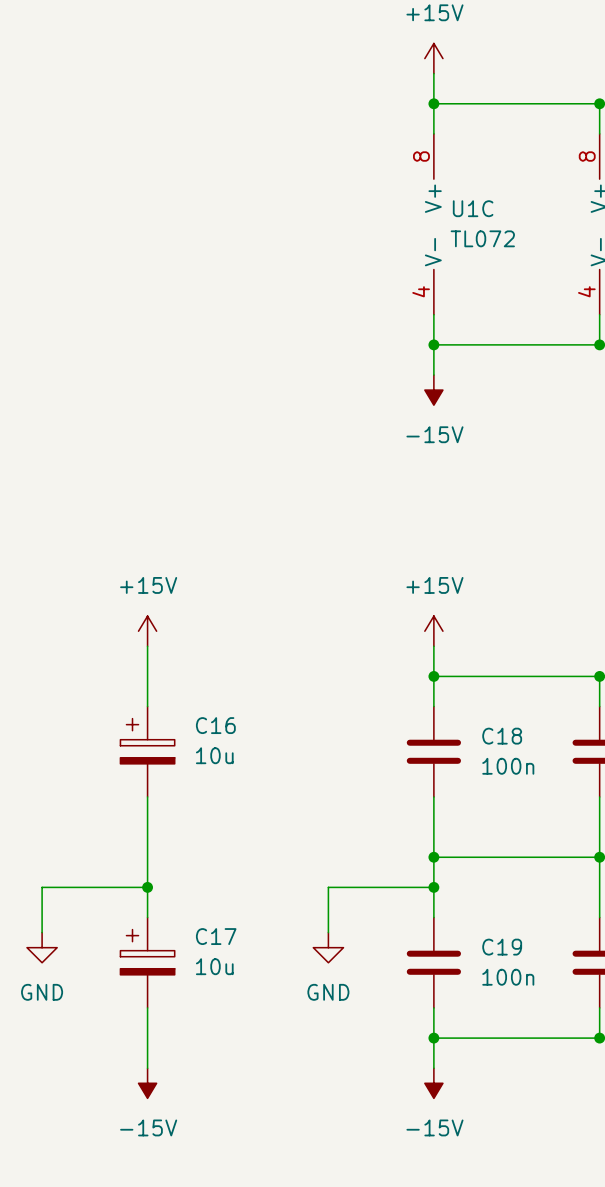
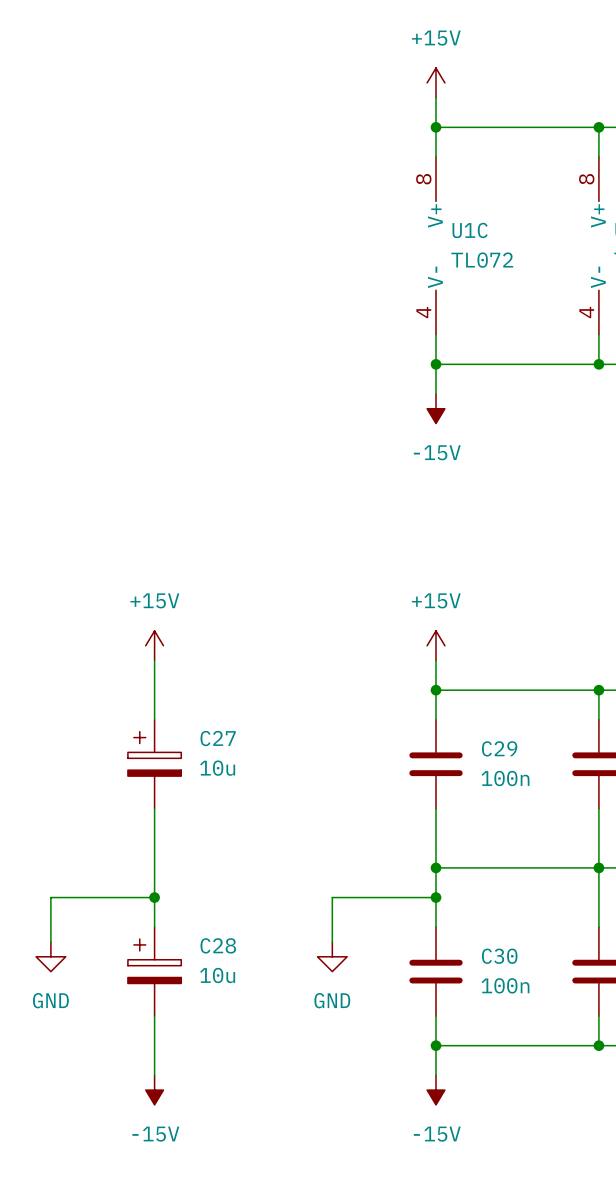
C16 name: C16 (215, 725) -> C27 (218, 738)
C18 name: C18 (502, 736) -> C29 (499, 748)
C17 name: C17 (216, 936) -> C28 (218, 945)
C19 name: C19 (502, 947) -> C30 (499, 956)

